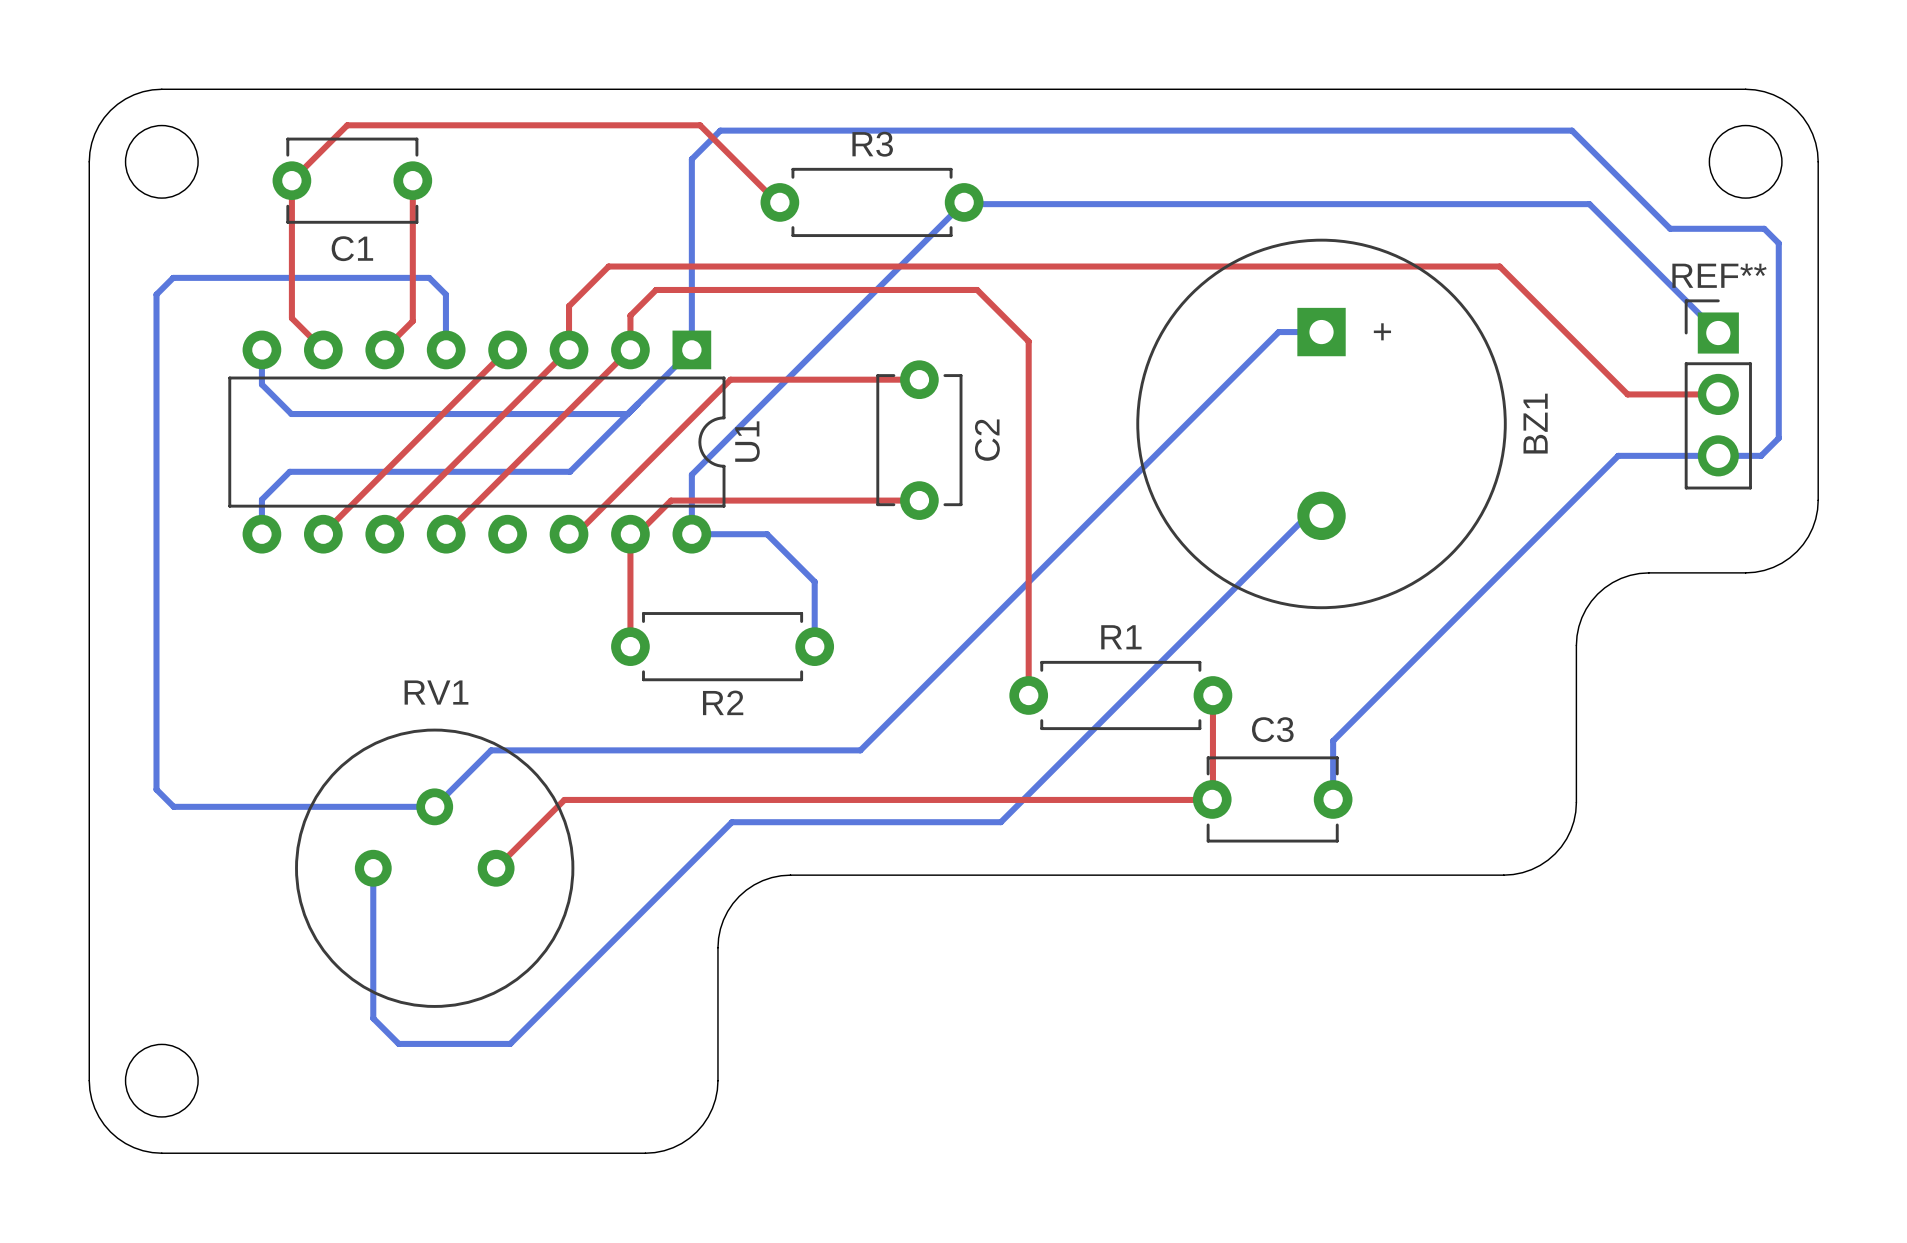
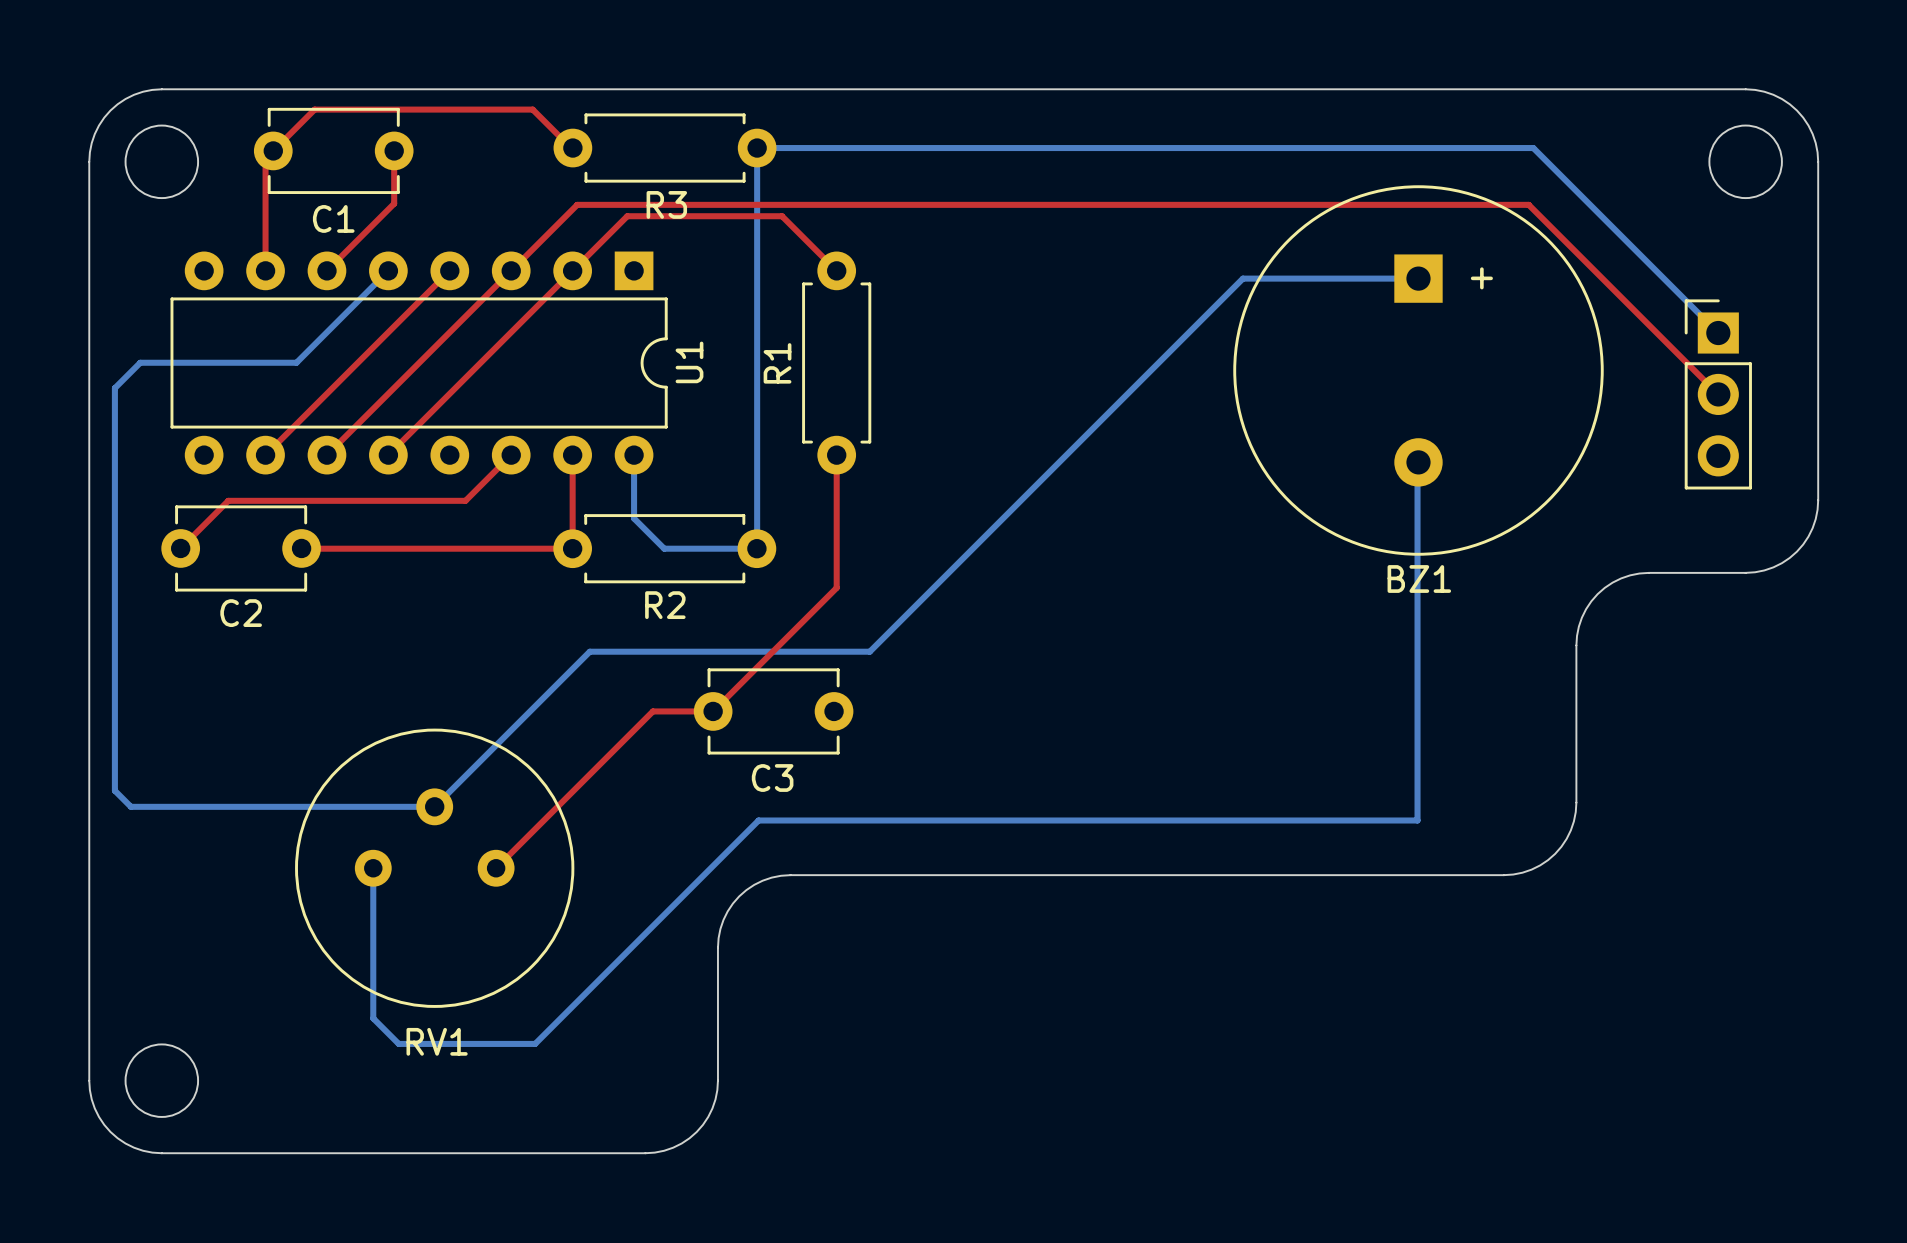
R3 name position: R3 (872, 144) -> R3 (666, 204)
top track: none -> (571, 148) (532, 109) (314, 109) (265, 158) (265, 270)
top track: none -> (394, 150) (394, 203) (326, 270)
C1 position: (352, 180) -> (333, 150)
top track: (412, 180) (412, 321) (384, 349) -> none
R3 position: (872, 202) -> (665, 148)
bottom track: (964, 202) (691, 474) (691, 534) (767, 534) (814, 581) (814, 646) -> none
top track: (778, 204) (700, 125) (347, 125) (291, 180) (291, 318) (323, 349) -> none
bottom track: (963, 204) (1589, 204) -> (757, 548) (757, 148) (1533, 148) (1589, 204)
top track: none -> (449, 270) (265, 455)
top track: none -> (836, 270) (782, 216) (627, 216) (388, 455)
REF** name: REF** (1719, 275) -> none
bottom track: (1321, 332) (1278, 332) (860, 750) (491, 750) -> (1418, 278) (1242, 278) (869, 651) (589, 651) (491, 750)
bottom track: (261, 349) (261, 384) (291, 414) (627, 414) -> none
bottom track: (445, 349) (445, 294) (429, 277) (173, 277) (156, 294) (156, 789) (173, 806) -> (388, 270) (296, 362) (140, 362) (114, 388) (114, 790) (130, 806) (173, 806)
top track: (507, 349) (323, 533) (323, 541) -> none
top track: (568, 349) (384, 533) (384, 541) -> none
top track: (569, 349) (569, 306) (608, 266) (1499, 266) (1627, 394) (1718, 394) -> (326, 455) (577, 204) (1528, 204) (1718, 394)
top track: (630, 349) (445, 533) (445, 541) -> none
top track: (630, 349) (630, 315) (656, 289) (977, 289) (1028, 341) (1028, 695) -> none
top track: (919, 379) (730, 379) (568, 541) -> none
BZ1 position: (1321, 423) -> (1418, 370)
BZ1 name rotation: 0° (1535, 423) -> 90° clockwise (1419, 579)
BZ1 name position: BZ1 (1535, 423) -> BZ1 (1419, 579)
C2 rotation: 0° (919, 440) -> 90° clockwise (241, 548)
C2 position: (919, 440) -> (241, 548)
U1 position: (476, 442) -> (419, 363)
top track: none -> (511, 455) (465, 500) (228, 500) (179, 549)
top track: none -> (572, 455) (572, 548) (301, 548)
bottom track: none -> (634, 455) (634, 518) (664, 548) (756, 548)
top track: (919, 500) (671, 500) (630, 541) -> none
bottom track: (1321, 515) (1307, 515) (1000, 822) (732, 822) (510, 1043) -> (1417, 465) (1417, 820) (758, 820) (535, 1043) (510, 1043)
bottom track: (261, 534) (261, 499) (289, 471) (569, 471) (691, 349) (691, 159) (720, 130) (1572, 130) (1670, 228) (1764, 228) (1778, 243) (1778, 438) (1761, 455) (1618, 455) (1333, 740) (1333, 799) -> none
top track: (630, 534) (630, 646) -> none
R1 name position: R1 (1121, 637) -> R1 (777, 363)
R2 position: (722, 646) -> (664, 548)
RV1 name position: RV1 (436, 692) -> RV1 (437, 1041)
R1 rotation: 0° (1120, 695) -> 90° clockwise (836, 363)
R1 position: (1120, 695) -> (836, 363)
top track: (1212, 695) (1212, 799) -> none
C3 name position: C3 (1272, 729) -> C3 (772, 778)
top track: (564, 799) (1199, 799) -> (564, 799) (652, 711) (713, 711) (836, 587) (836, 455)
C3 position: (1272, 799) -> (773, 711)

